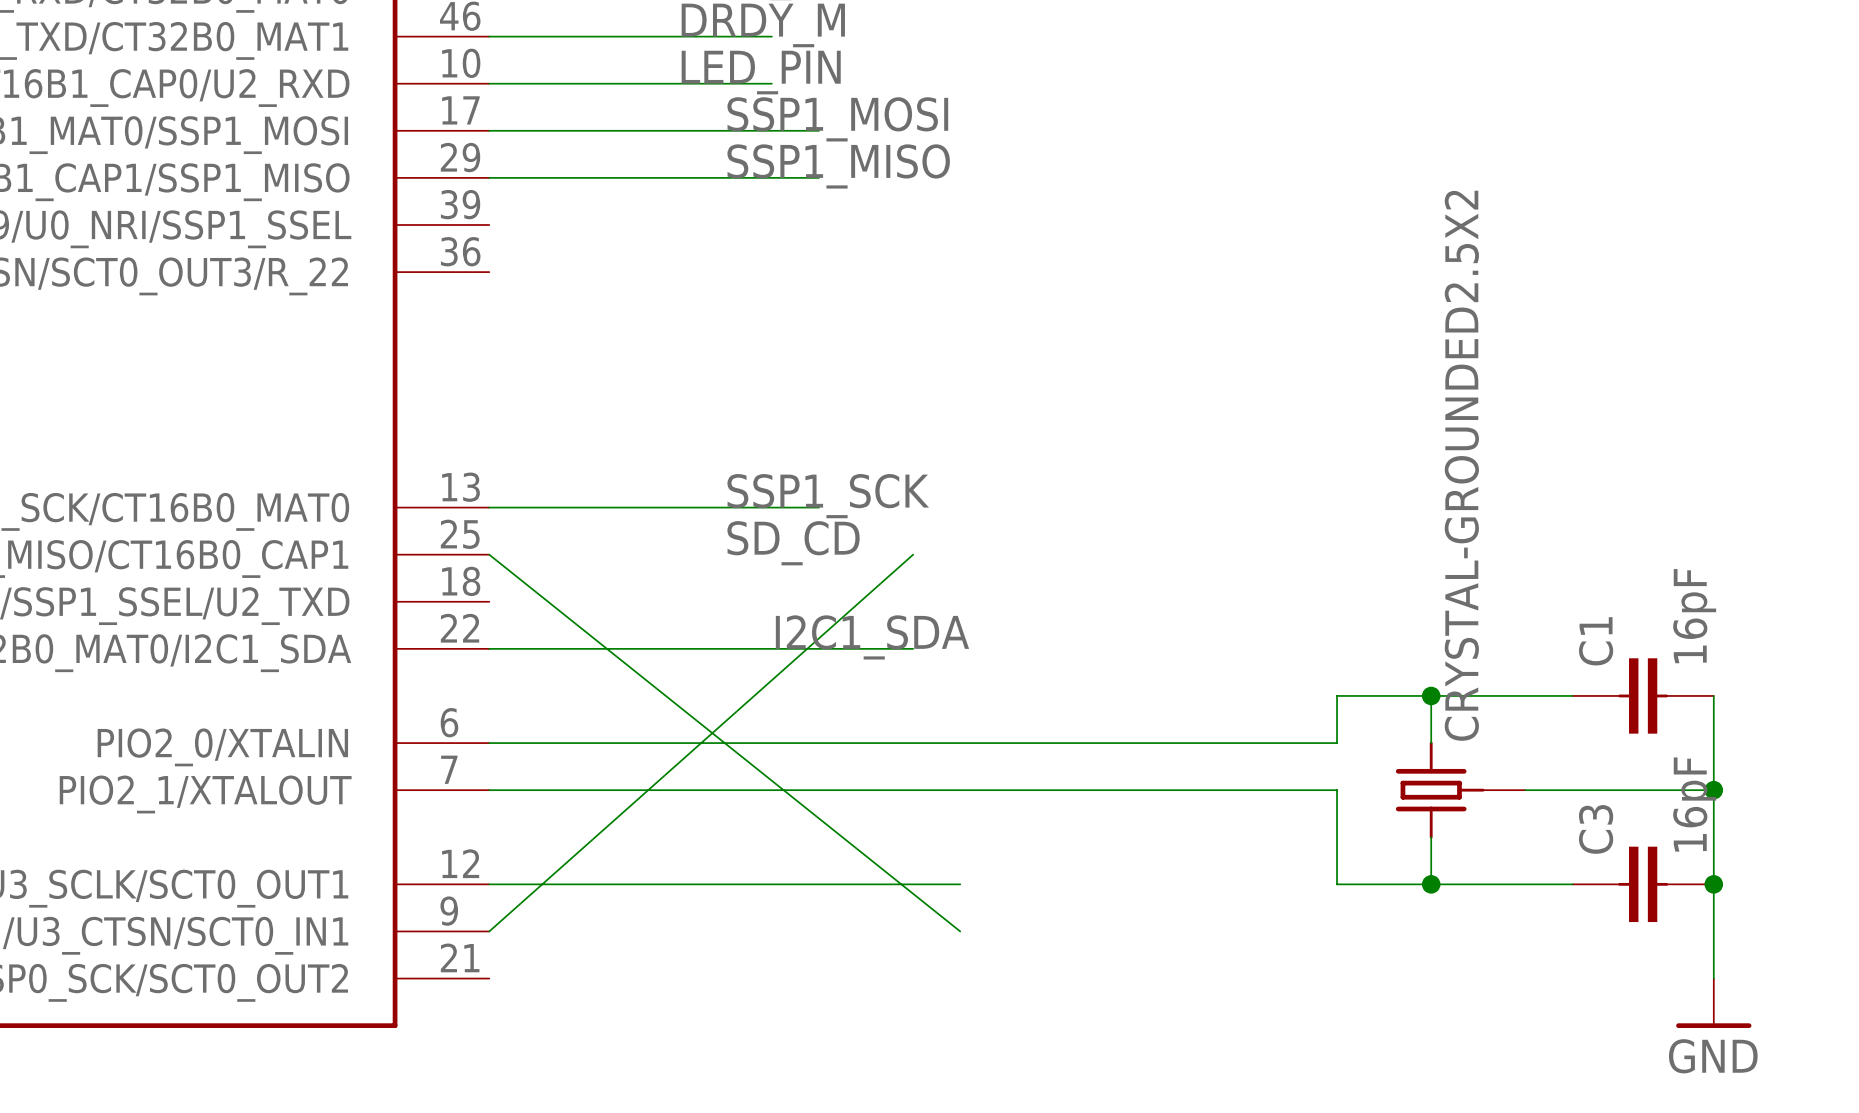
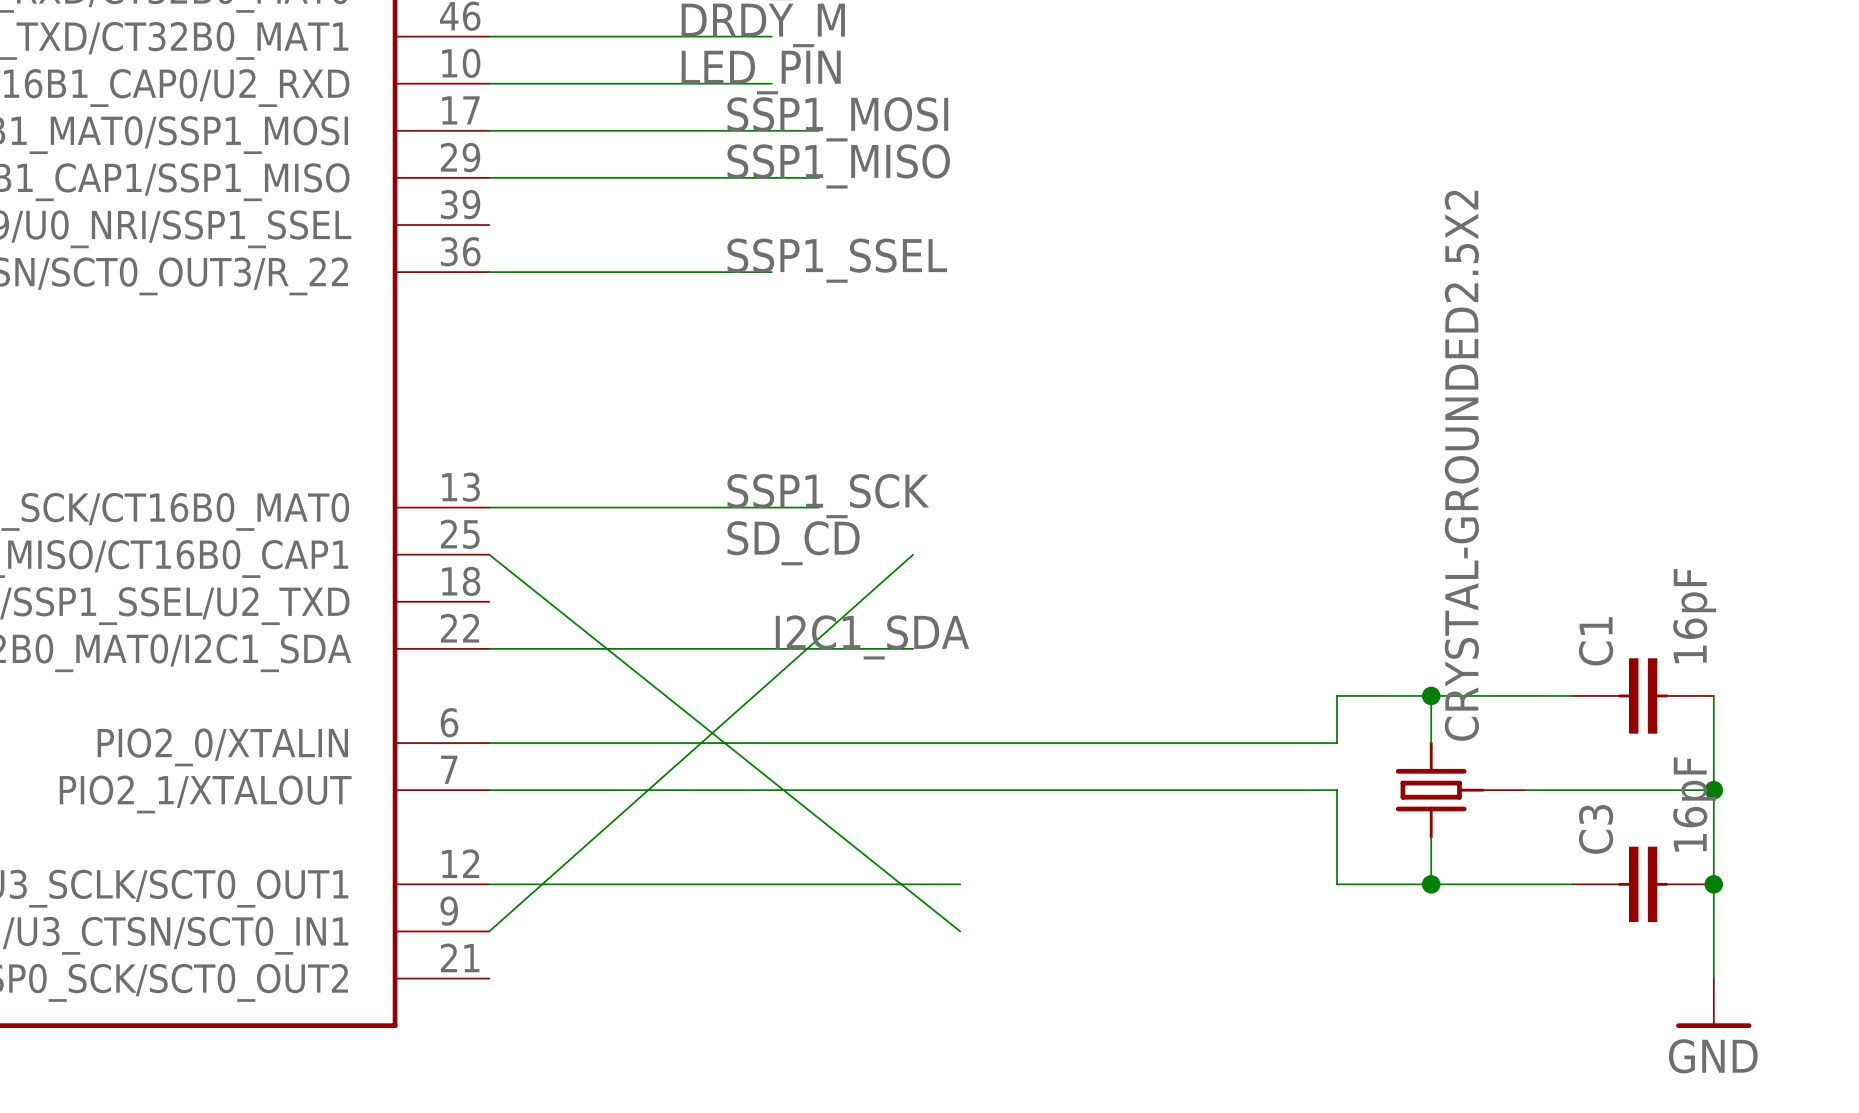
label: none -> SSP1_SSEL (837, 260)
wire: none -> (489, 272) (771, 272)

